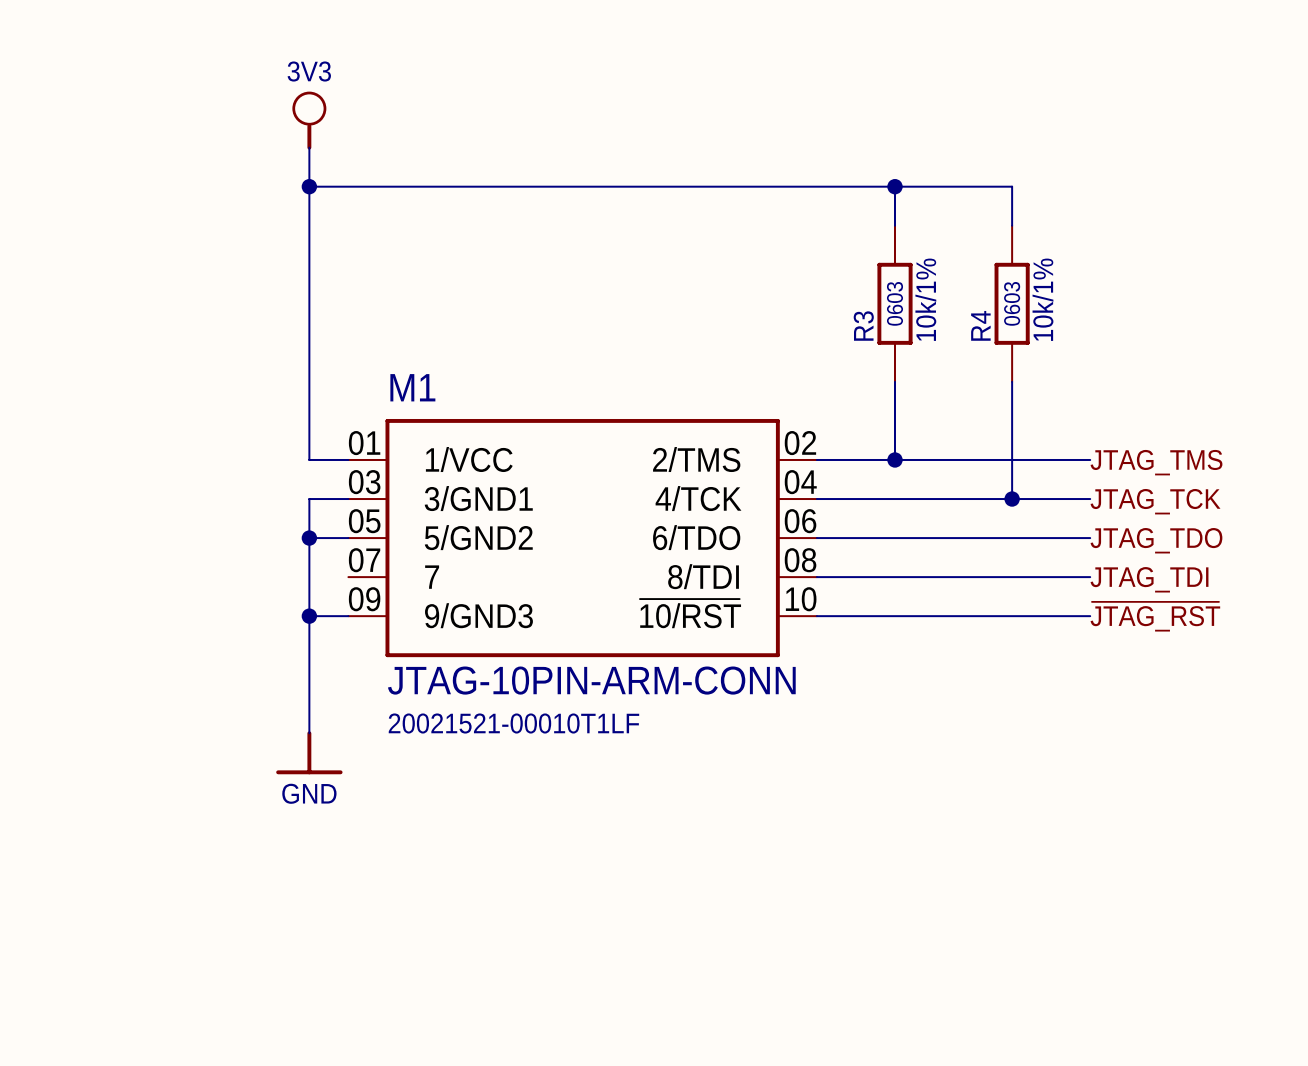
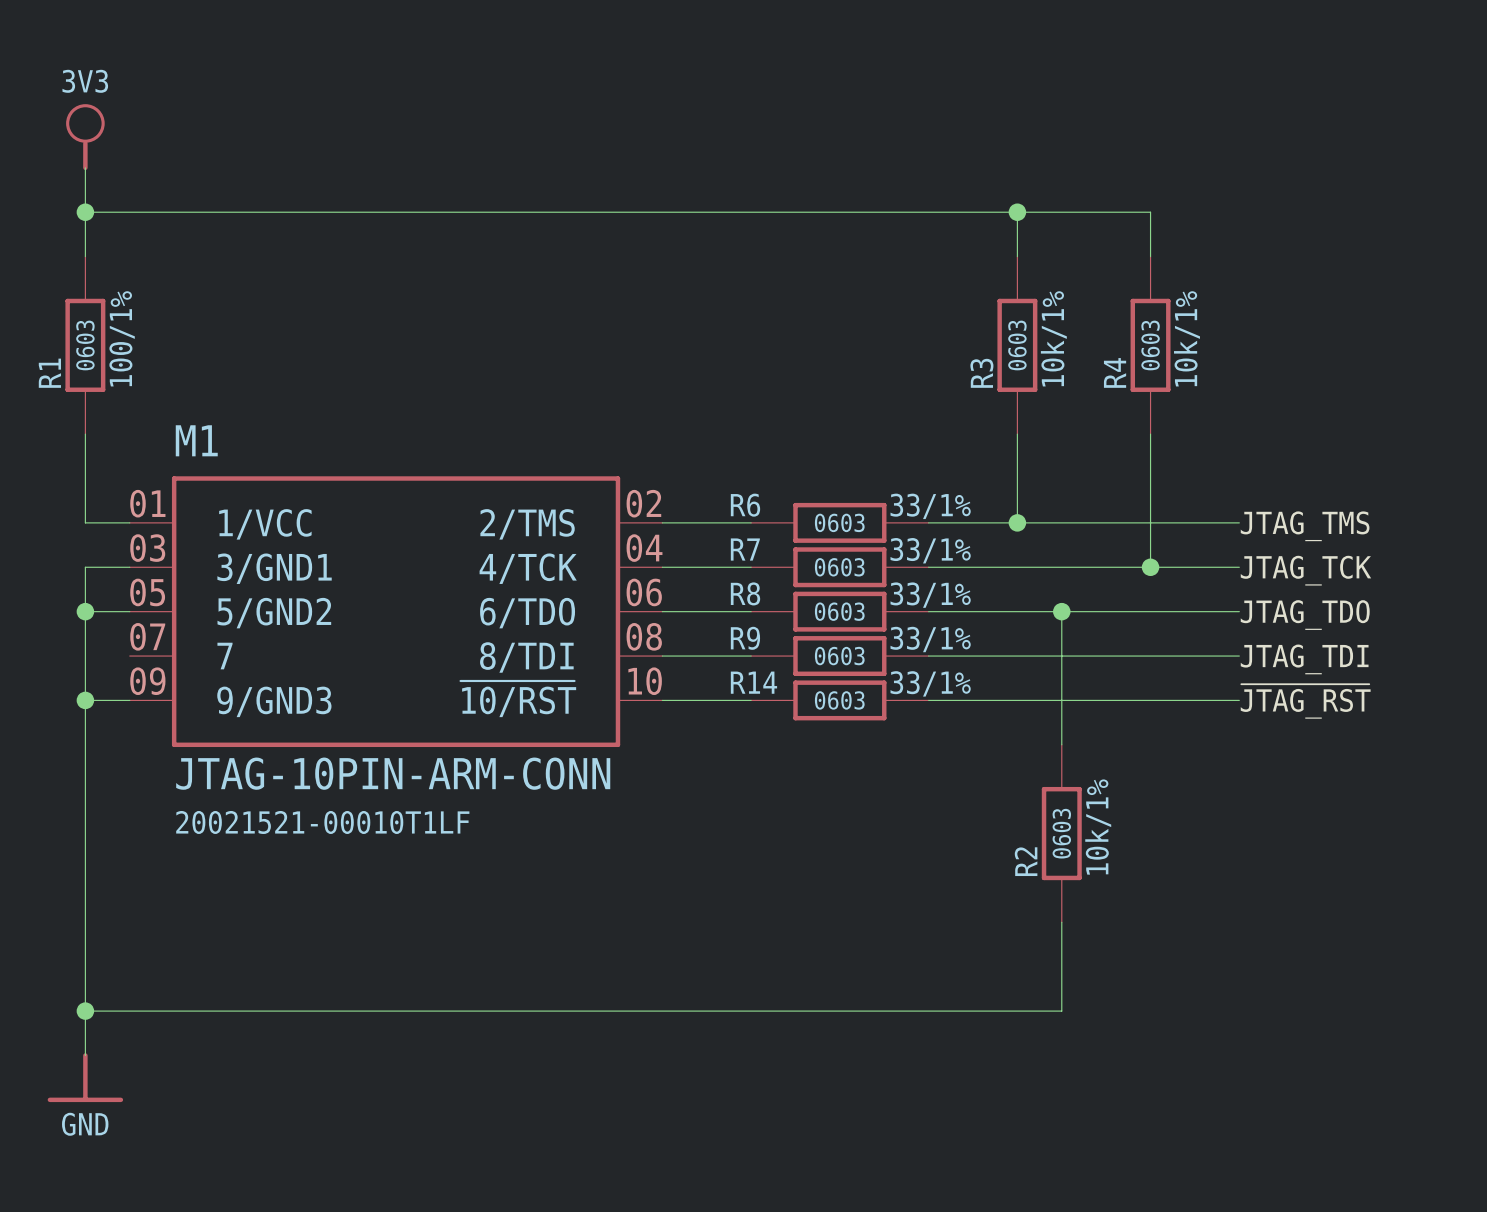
power symbol position: 3V3 (309, 120) -> 3V3 (85, 137)
wire: none -> (85, 167) (85, 256)
wire: (309, 147) (309, 459) (348, 459) -> none
wire: none -> (85, 212) (351, 212)
junction: none -> (85, 212)
junction: (309, 186) -> none
R1: none -> 100/1% (85, 345)
wire: none -> (85, 434) (85, 522) (129, 522)
wire: none -> (662, 522) (751, 522)
R6: none -> 33/1% (839, 522)
wire: none -> (129, 567) (85, 567) (85, 1055)
wire: (348, 499) (309, 499) (309, 733) -> none
wire: none -> (662, 567) (751, 567)
R7: none -> 33/1% (839, 567)
junction: none -> (85, 611)
wire: (309, 538) (348, 538) -> (85, 611) (129, 611)
junction: (309, 538) -> none
wire: none -> (662, 611) (751, 611)
M1 position: (582, 538) -> (396, 611)
R8: none -> 33/1% (839, 611)
wire: none -> (1061, 611) (1061, 744)
junction: none -> (1061, 611)
wire: none -> (662, 656) (751, 656)
R9: none -> 33/1% (839, 656)
junction: none -> (85, 700)
wire: (309, 616) (348, 616) -> (85, 700) (129, 700)
junction: (309, 616) -> none
wire: none -> (662, 700) (751, 700)
R14: none -> 33/1% (839, 700)
R2: none -> 10k/1% (1061, 833)
power symbol position: GND (309, 752) -> GND (85, 1077)
wire: none -> (1061, 922) (1061, 1011) (85, 1011)
junction: none -> (85, 1011)

